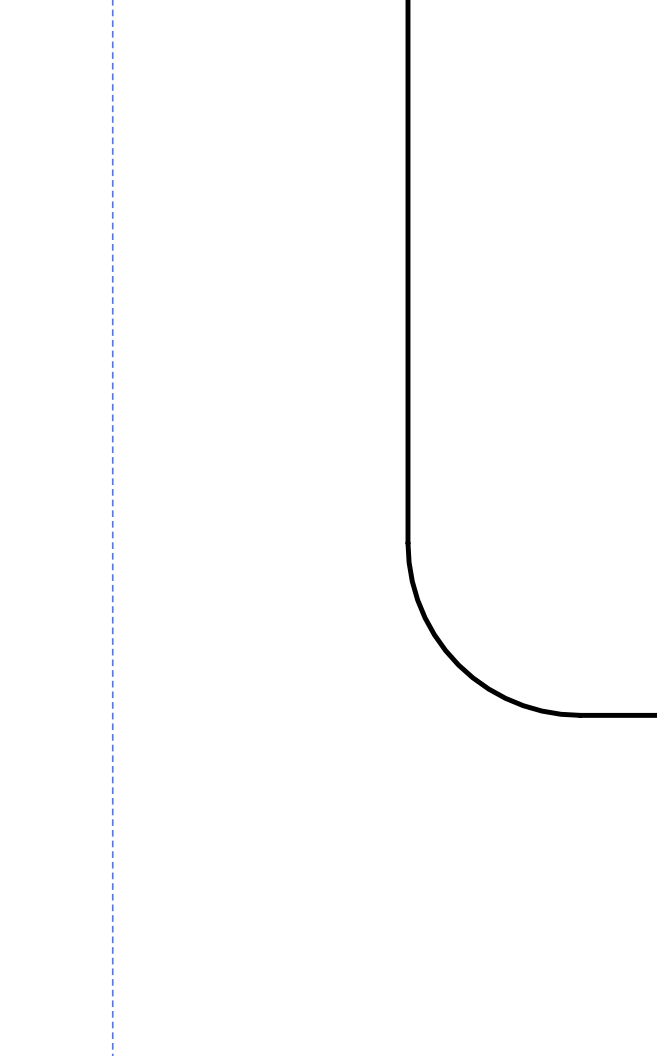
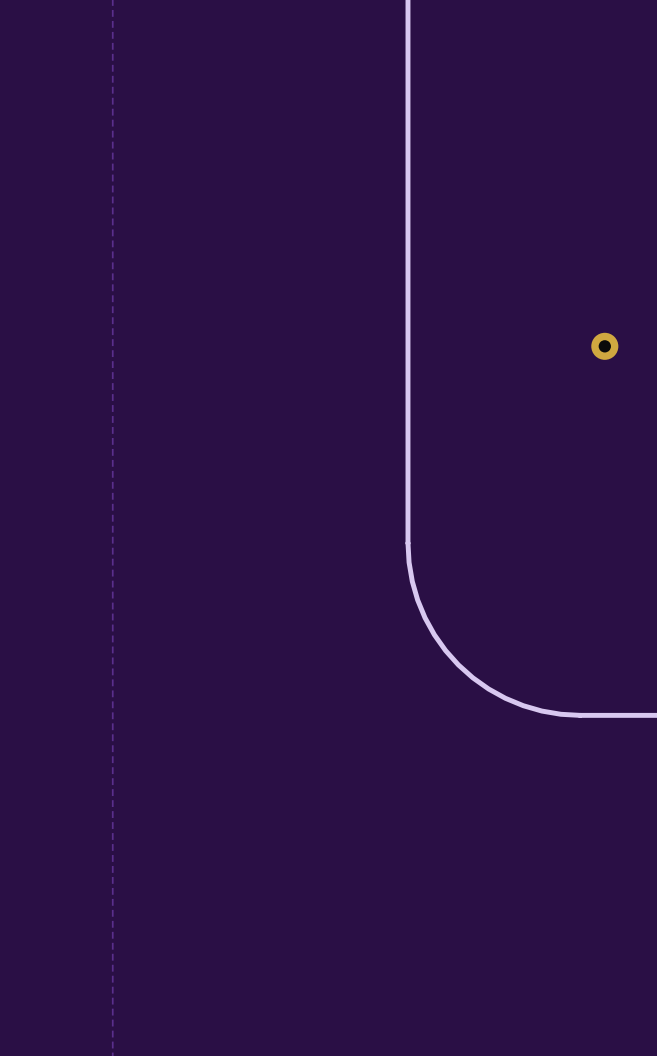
via: none -> (604, 346)

